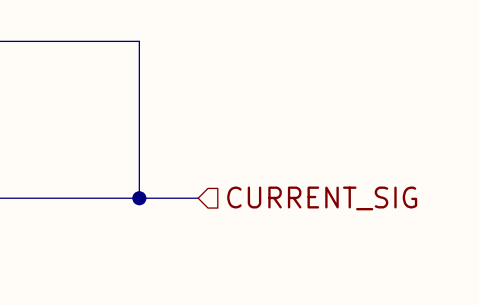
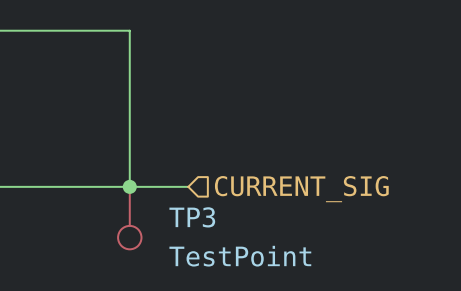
TP3: none -> TestPoint (129, 218)

